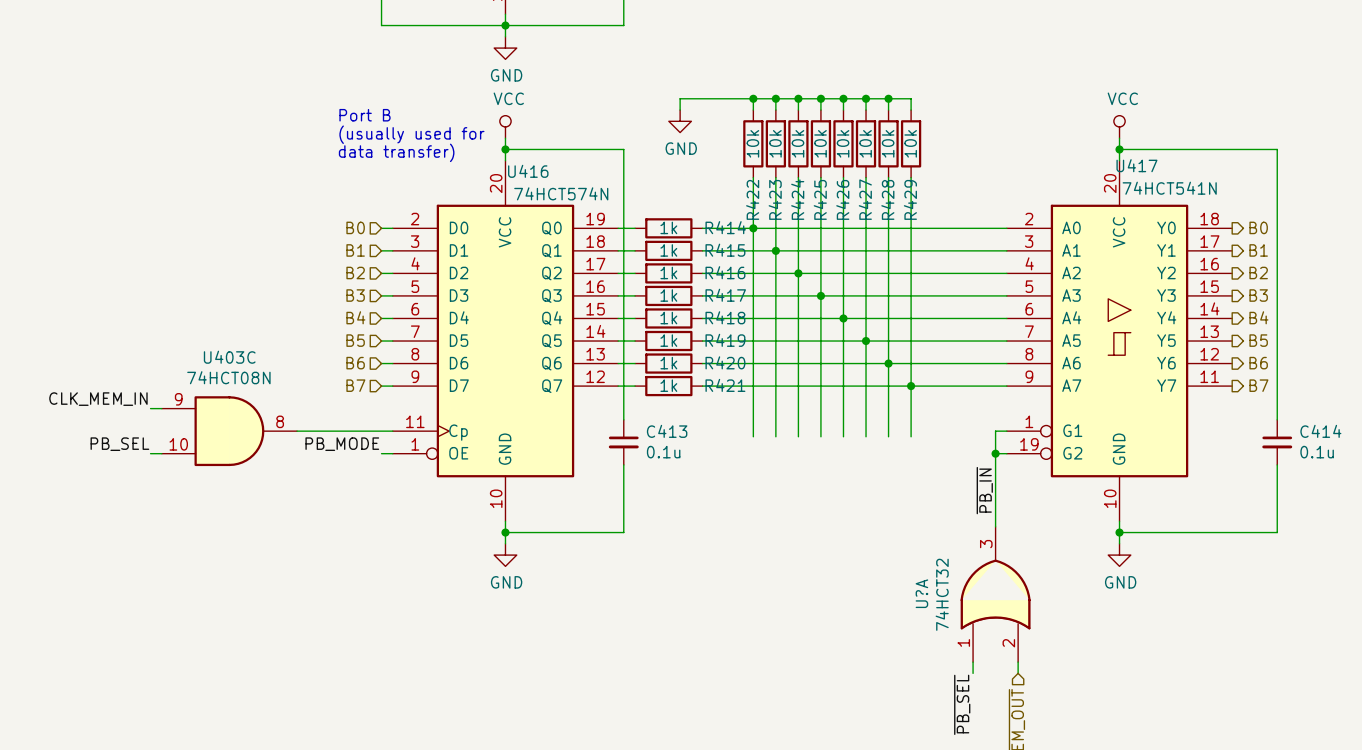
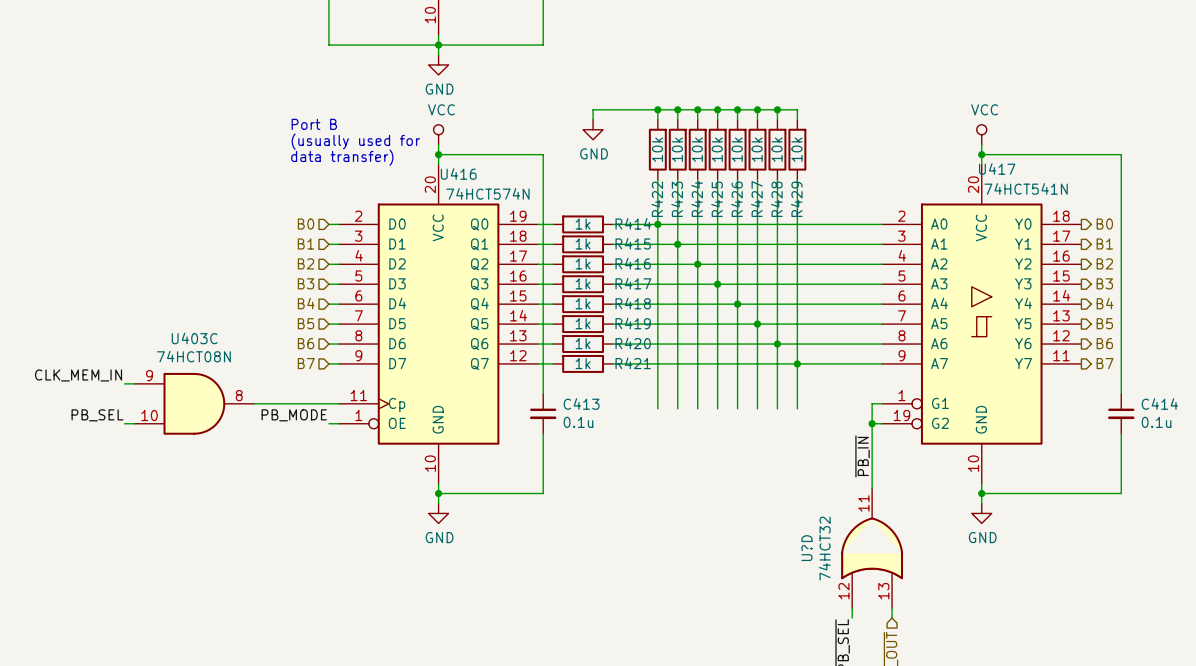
U?A pin number: 3 (986, 544) -> 11 (863, 503)
U?A name: U?A (921, 593) -> U?D (806, 548)
U?A pin number: 1 (963, 642) -> 12 (843, 591)
U?A pin number: 2 (1008, 643) -> 13 (883, 591)

